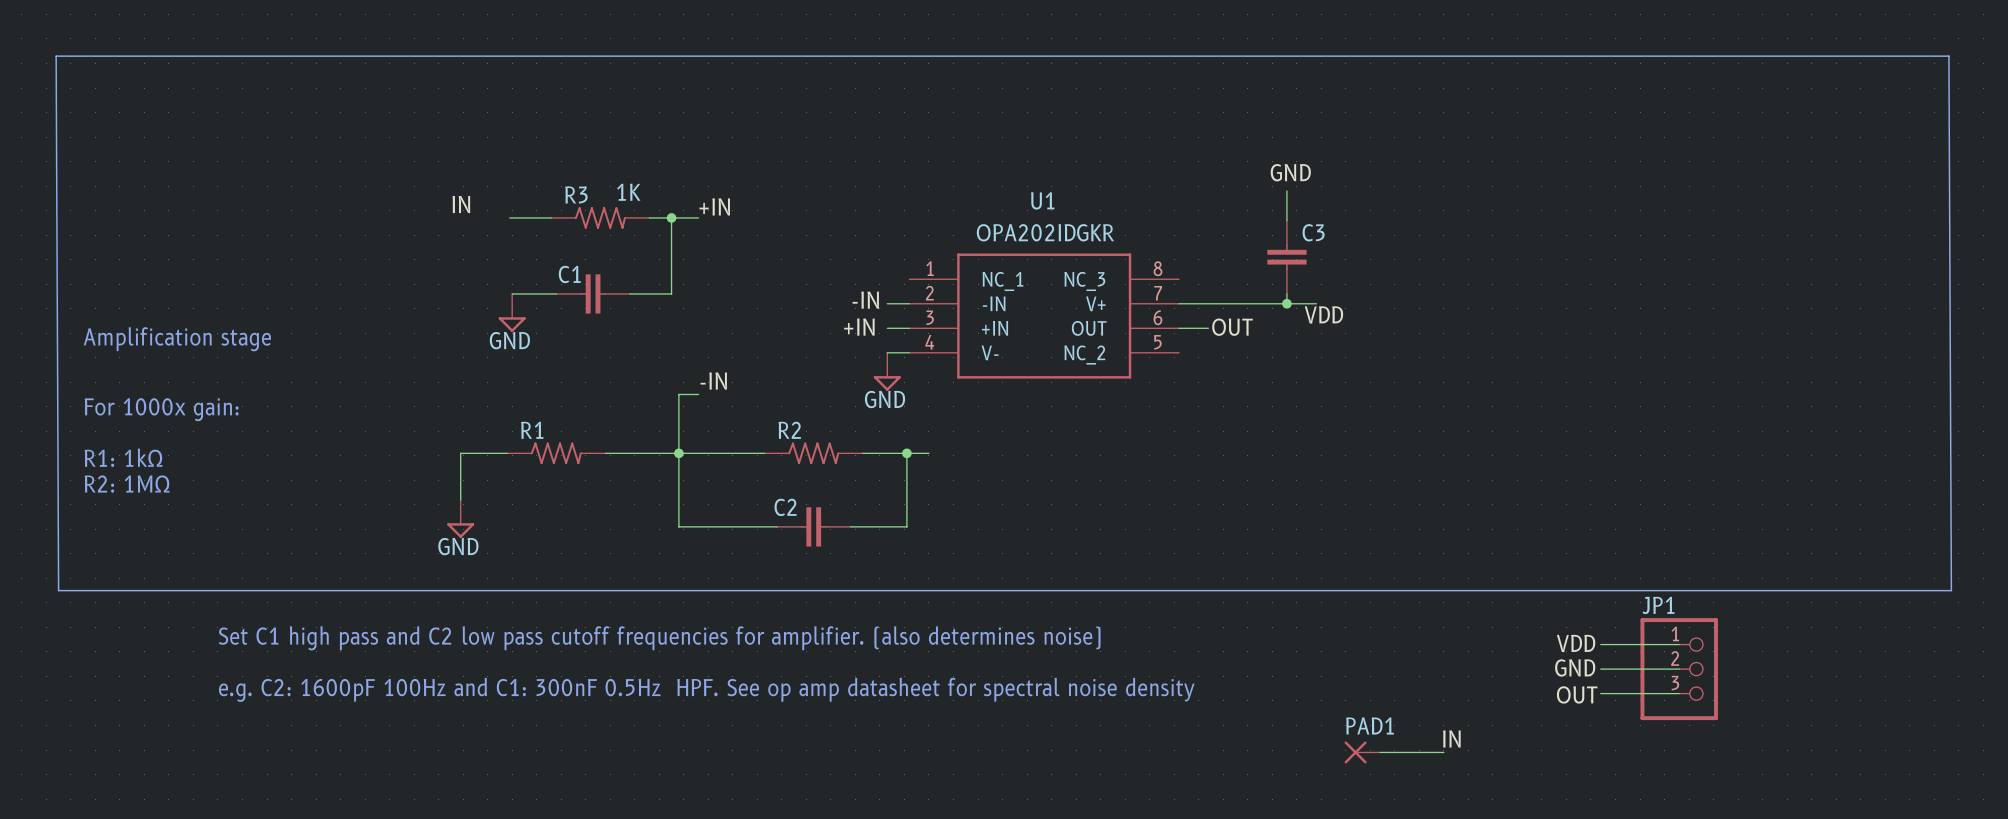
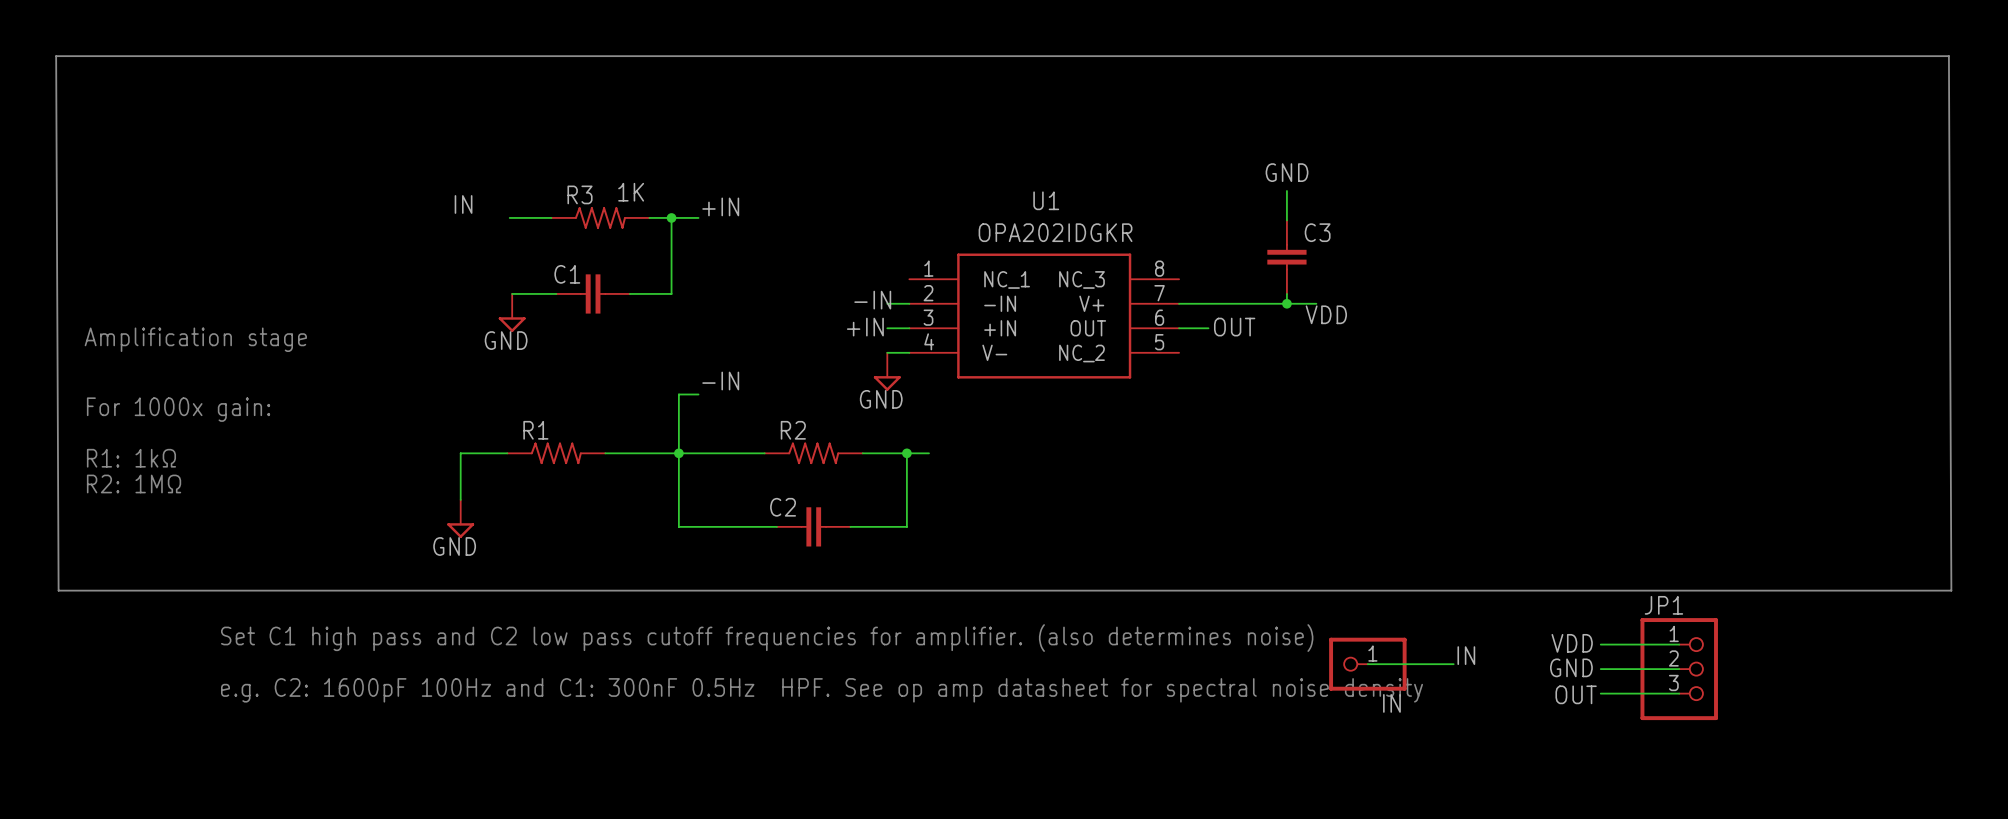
wire: none -> (1367, 664) (1453, 664)
IN: none -> (1367, 664)
label position: IN (1451, 738) -> IN (1466, 655)
PAD1: (1362, 752) -> none
wire: (1380, 752) (1443, 752) -> none

